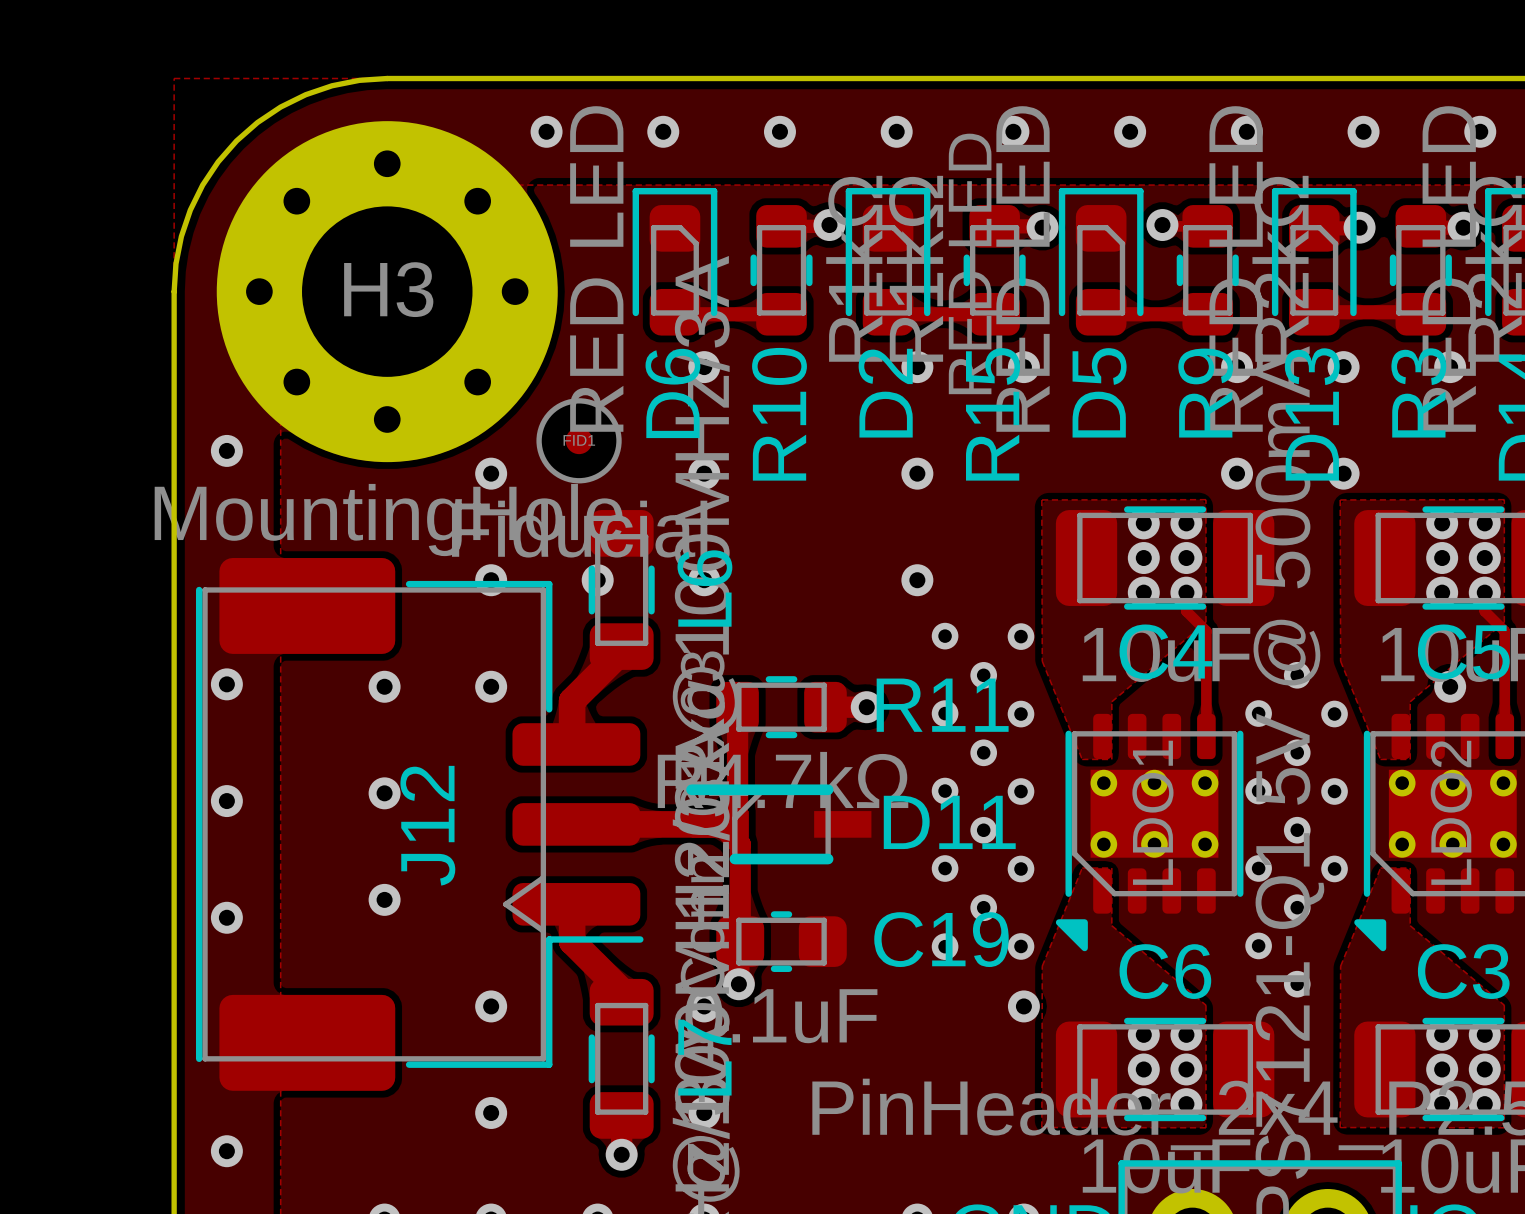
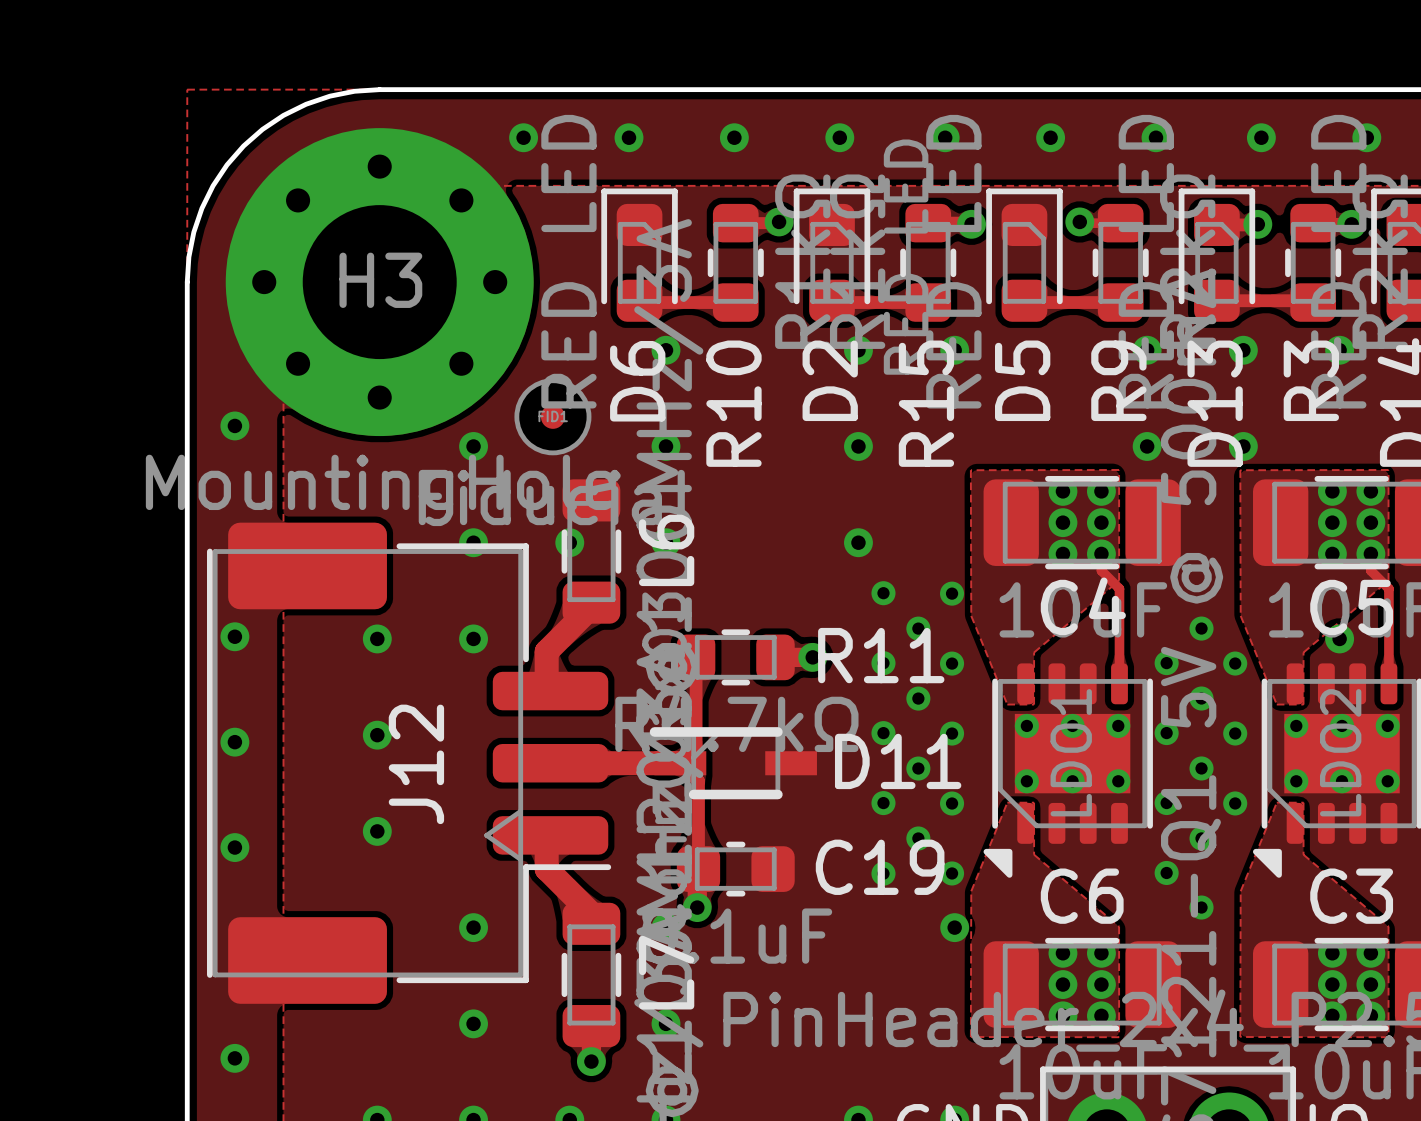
track width: thick (737, 707) (737, 807) (720, 824) (740, 844) (740, 941) -> thin (696, 657) (696, 747) (680, 763) (698, 781) (698, 869)

